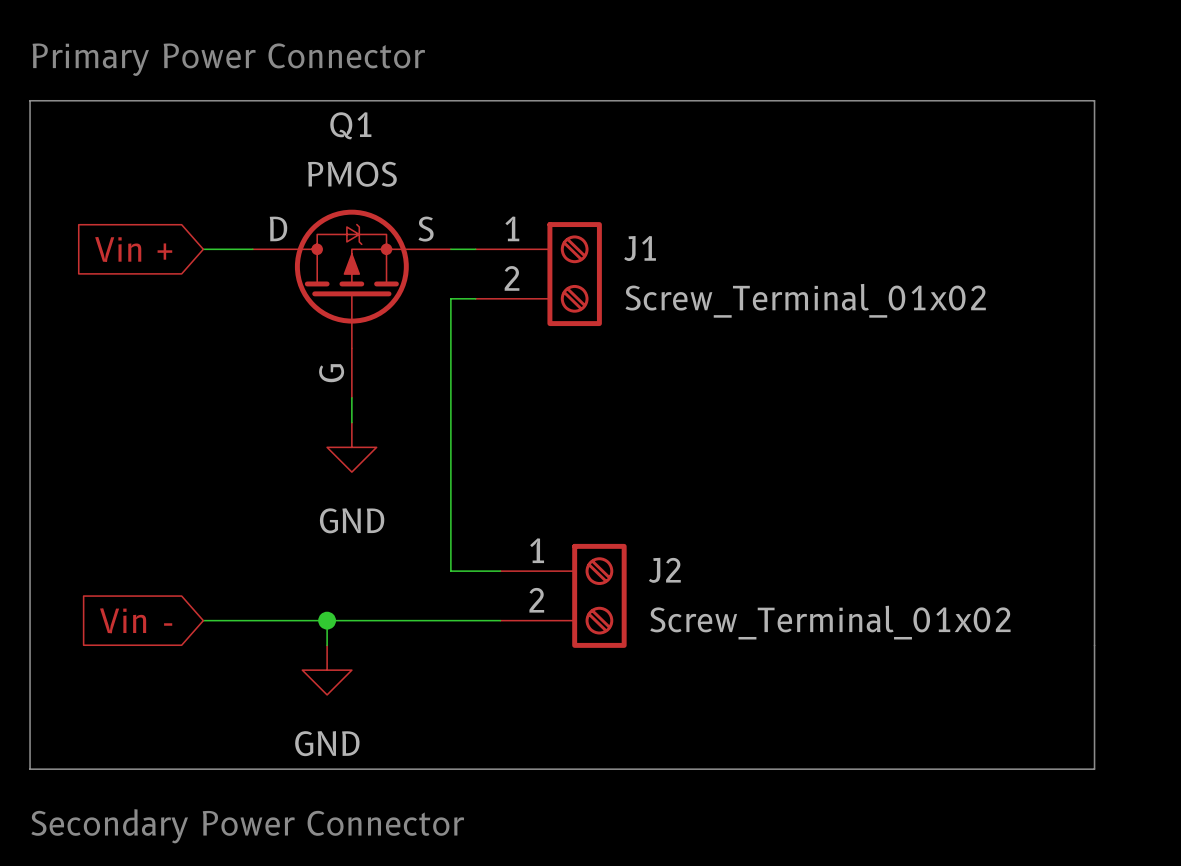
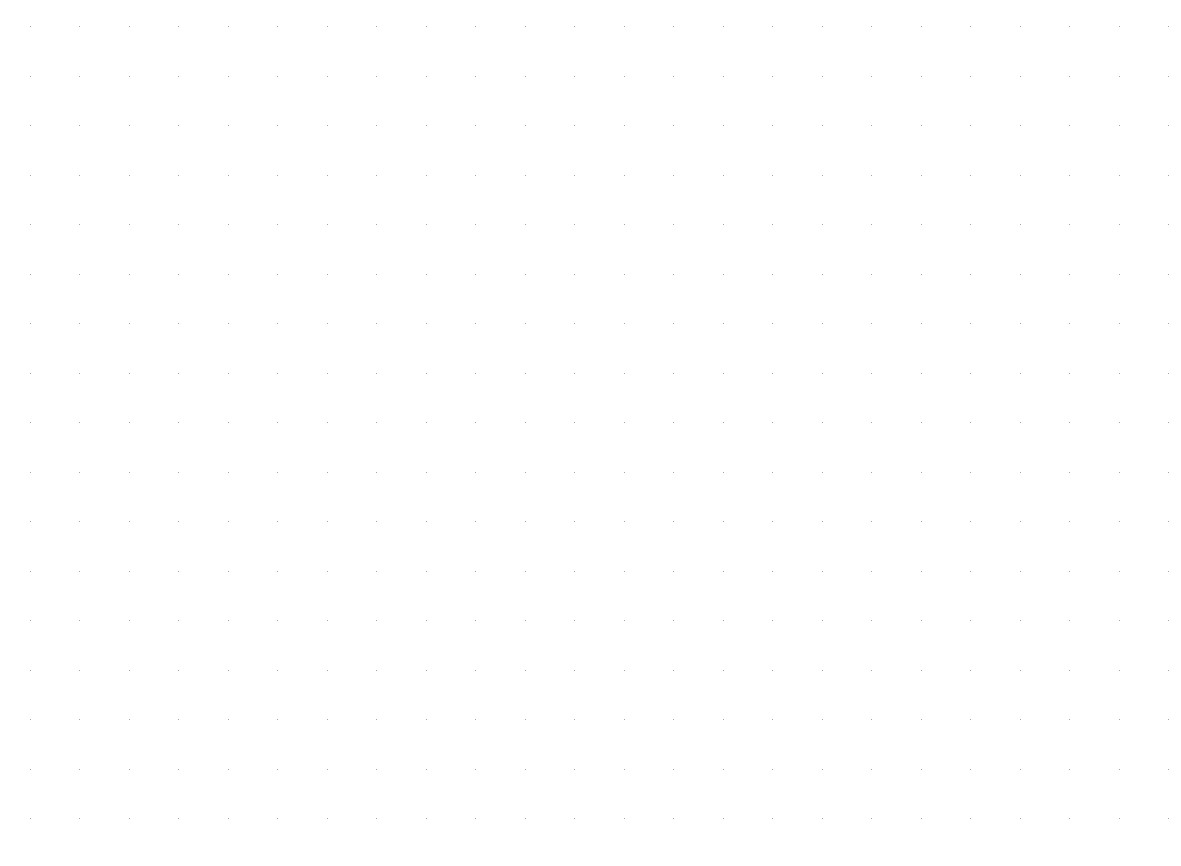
text: Primary Power Connector (228, 59) -> none
line: (30, 100) (1094, 100) (1094, 769) (30, 769) (30, 100) -> none
global label: Vin + (133, 249) -> none
wire: (203, 249) (252, 249) -> none
wire: (450, 249) (475, 249) -> none
J1: Screw_Terminal_01x02 (538, 274) -> none
wire: (475, 298) (450, 298) (450, 571) (500, 571) -> none
Q1: PMOS (351, 303) -> none
wire: (351, 397) (351, 422) -> none
power symbol: GND (351, 447) -> none
J2: Screw_Terminal_01x02 (563, 595) -> none
global label: Vin - (136, 620) -> none
wire: (203, 620) (500, 620) -> none
wire: (327, 620) (327, 645) -> none
junction: (327, 620) -> none
power symbol: GND (327, 670) -> none
text: Secondary Power Connector (247, 826) -> none

